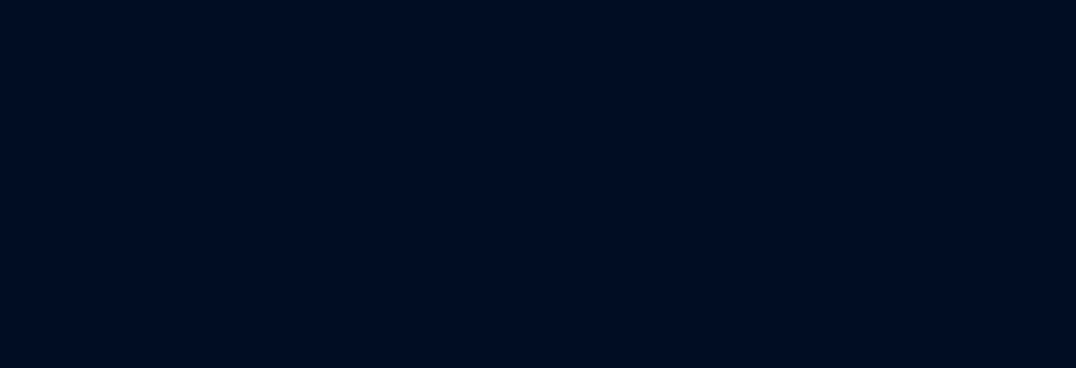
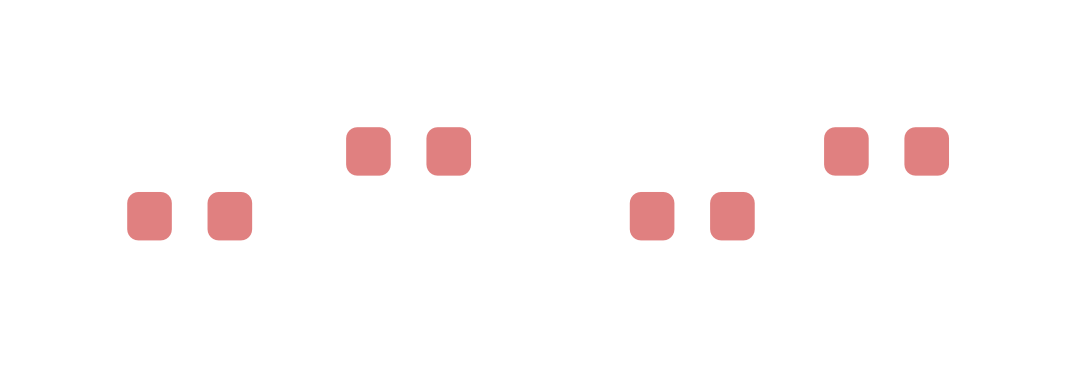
part: none -> (408, 151)
part: none -> (886, 151)
part: none -> (189, 216)
part: none -> (692, 216)

